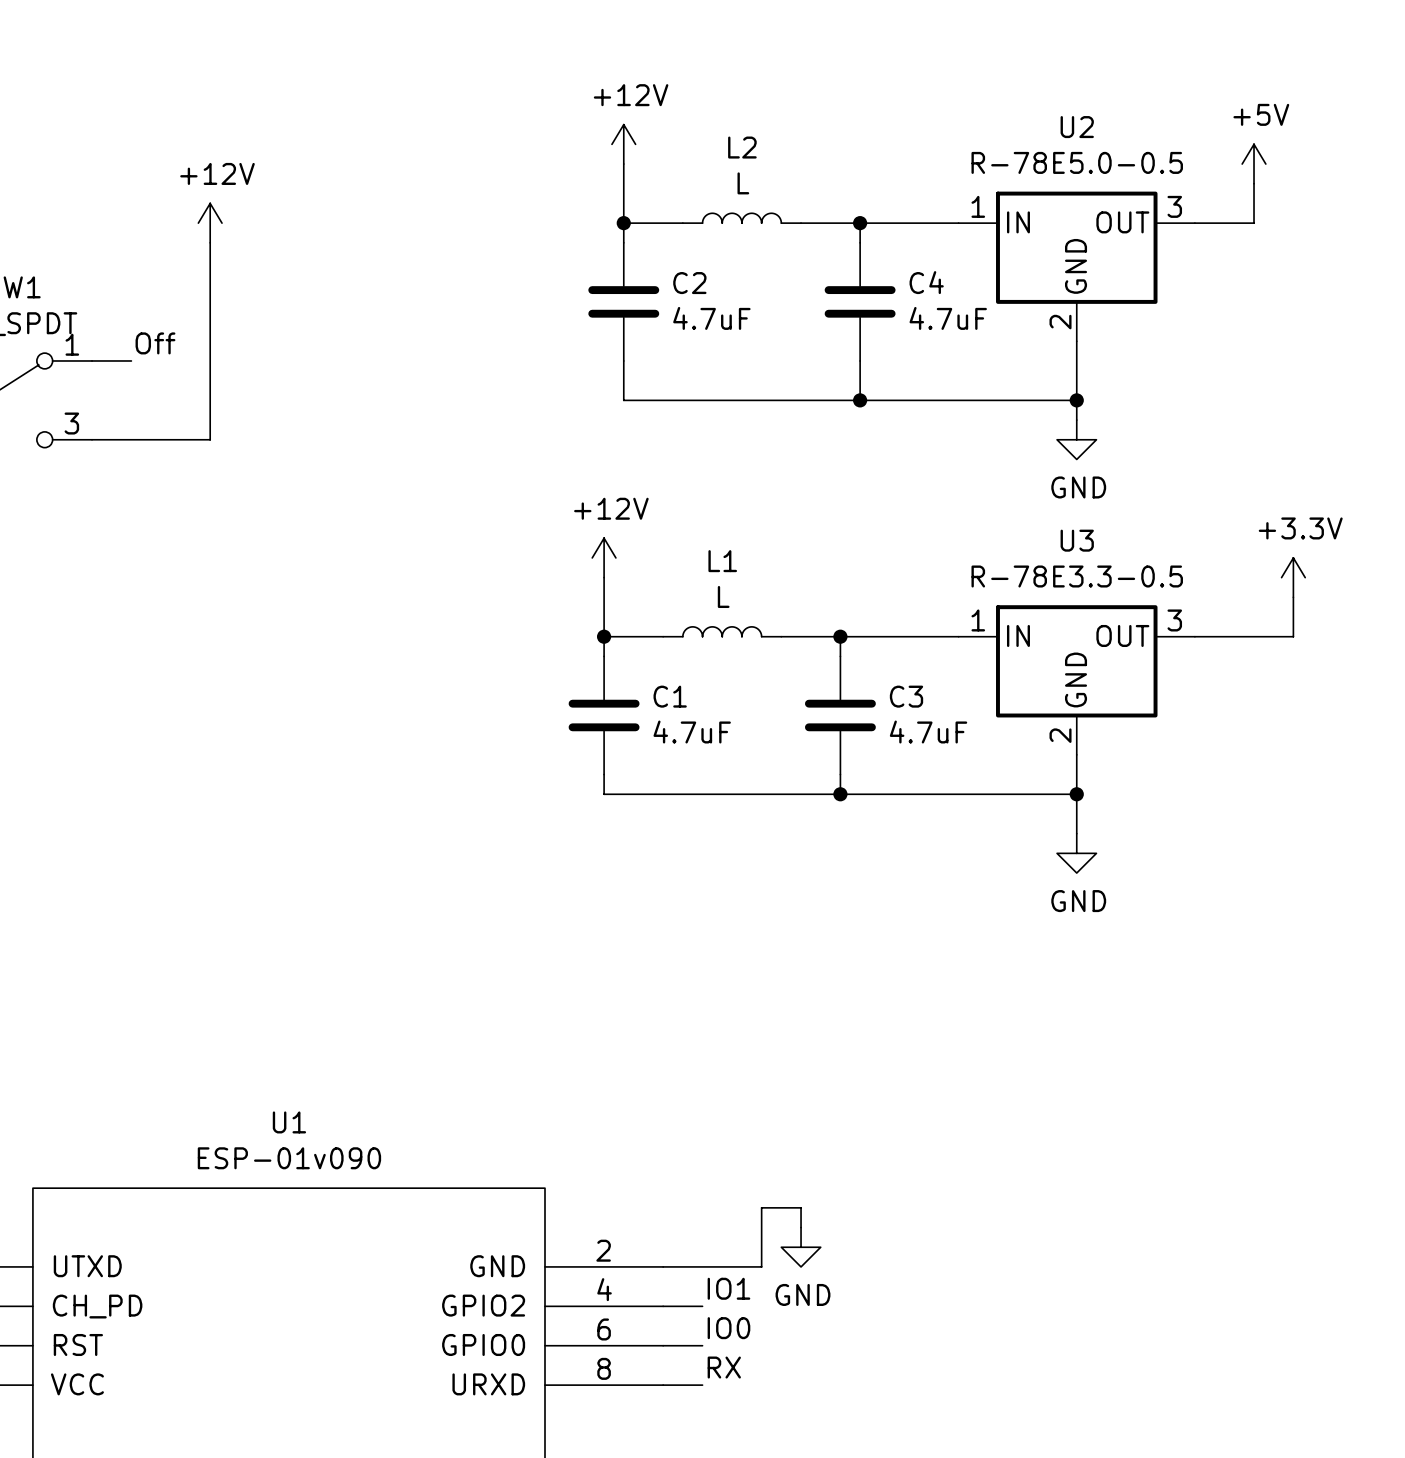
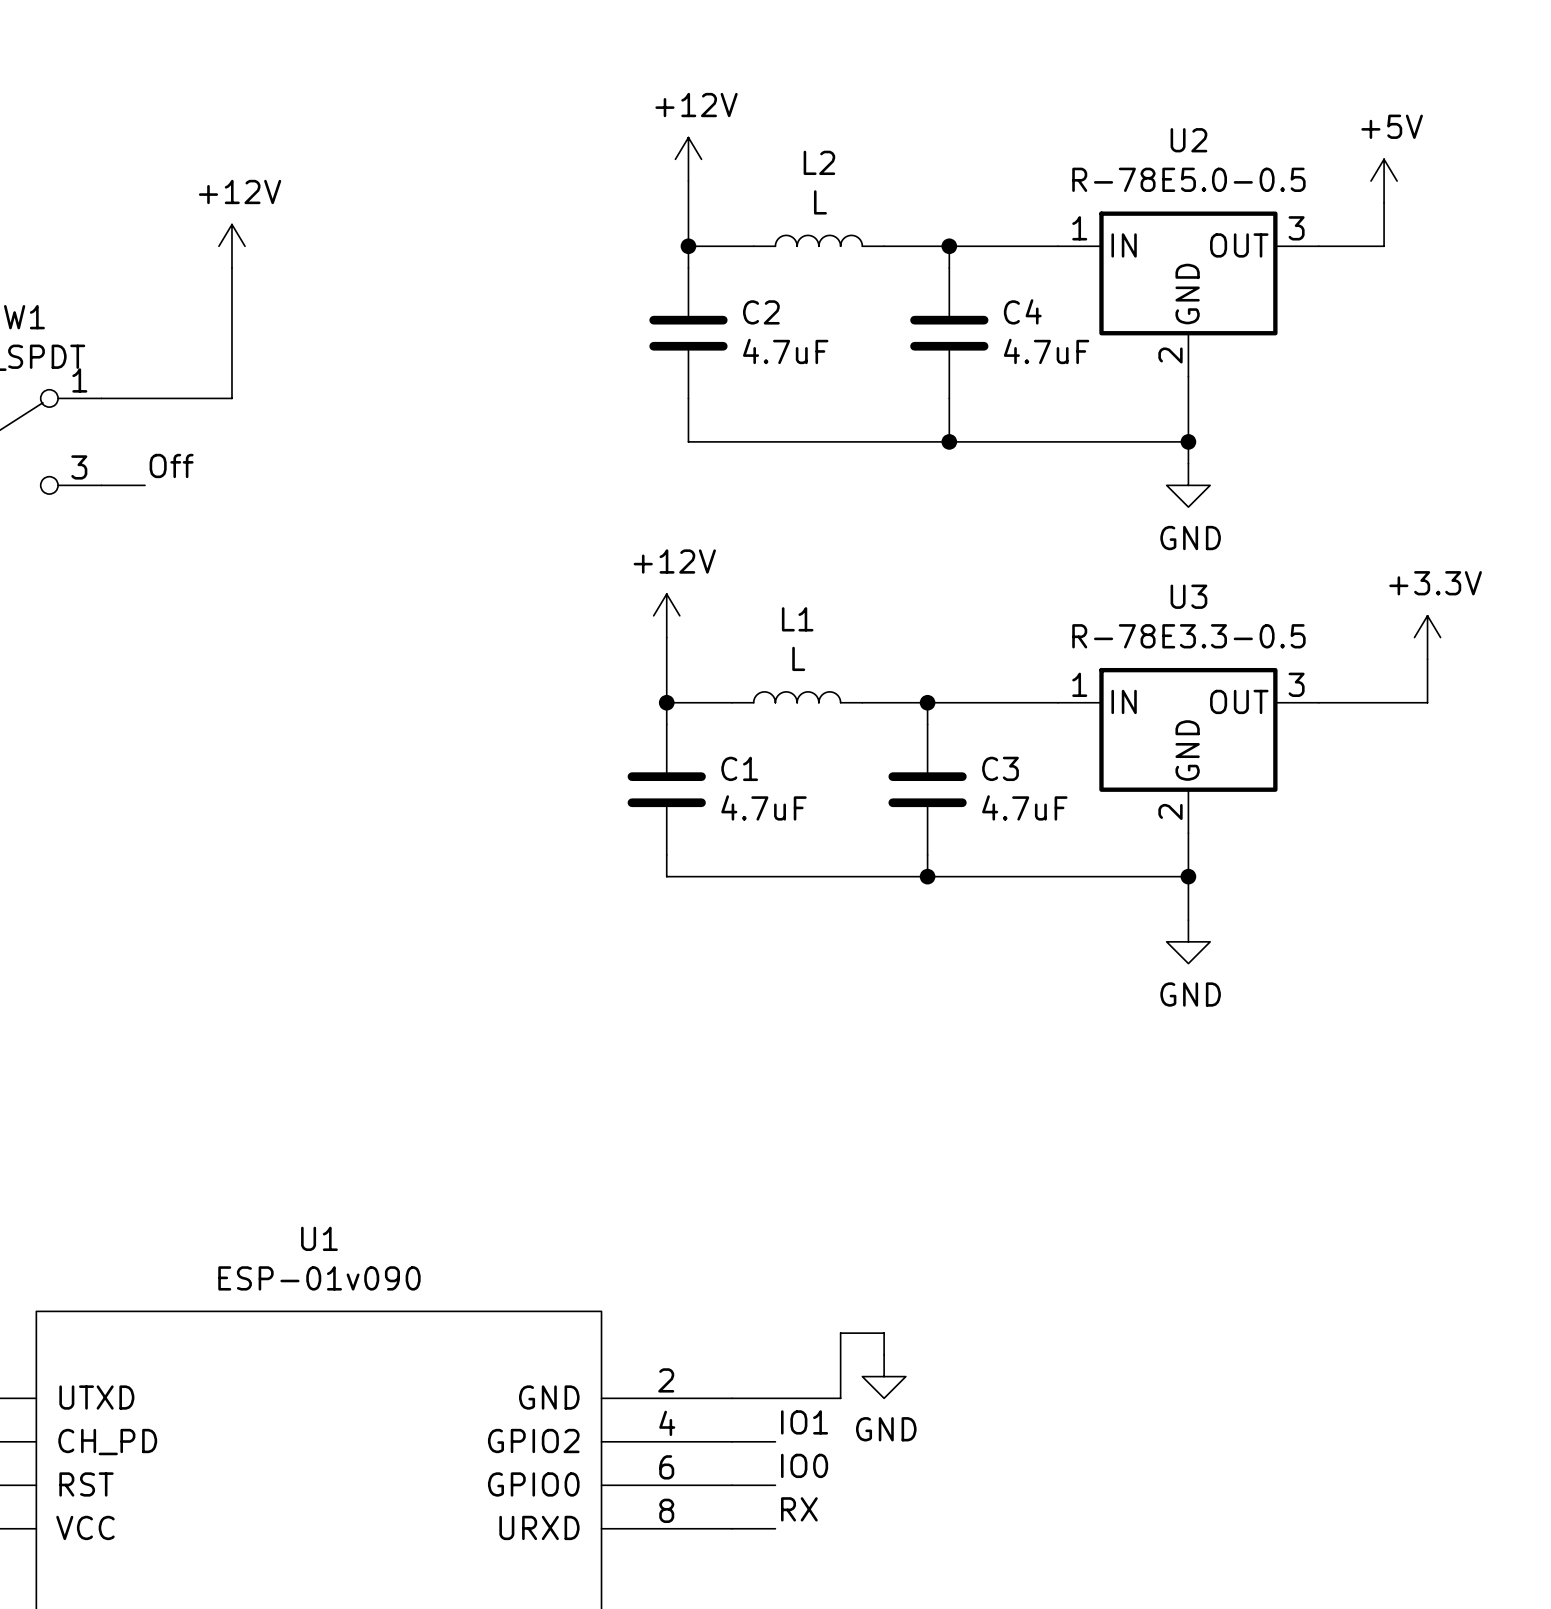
label position: Off (155, 343) -> Off (171, 465)
wire: (210, 360) (210, 439) (131, 439) -> (231, 398) (145, 398)

